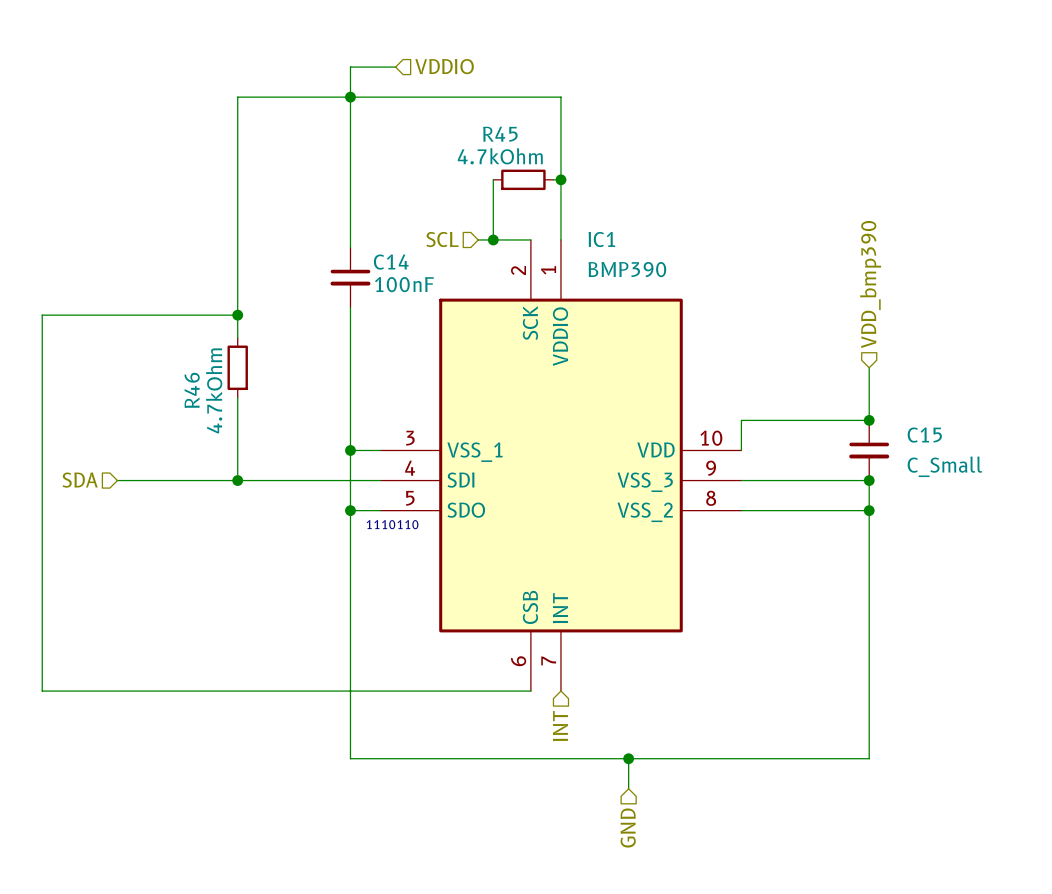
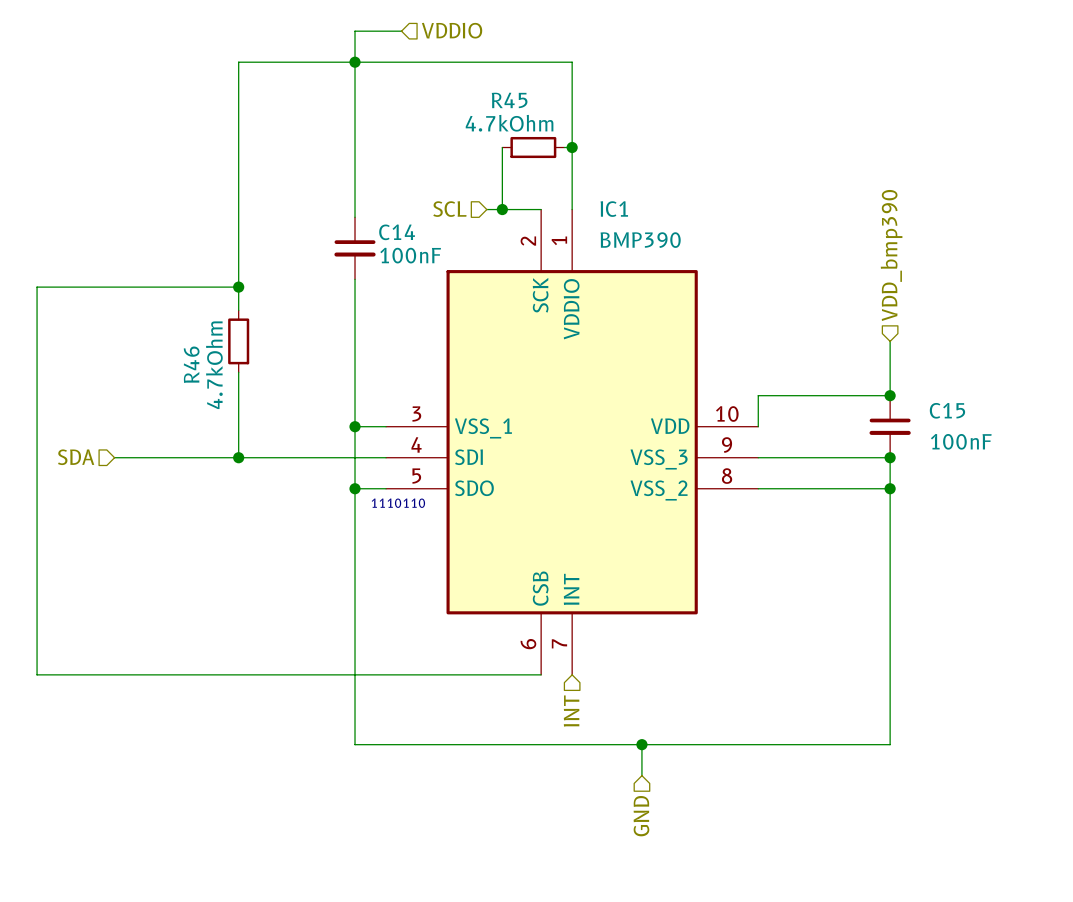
C15 value: C_Small (944, 466) -> 100nF (961, 441)

